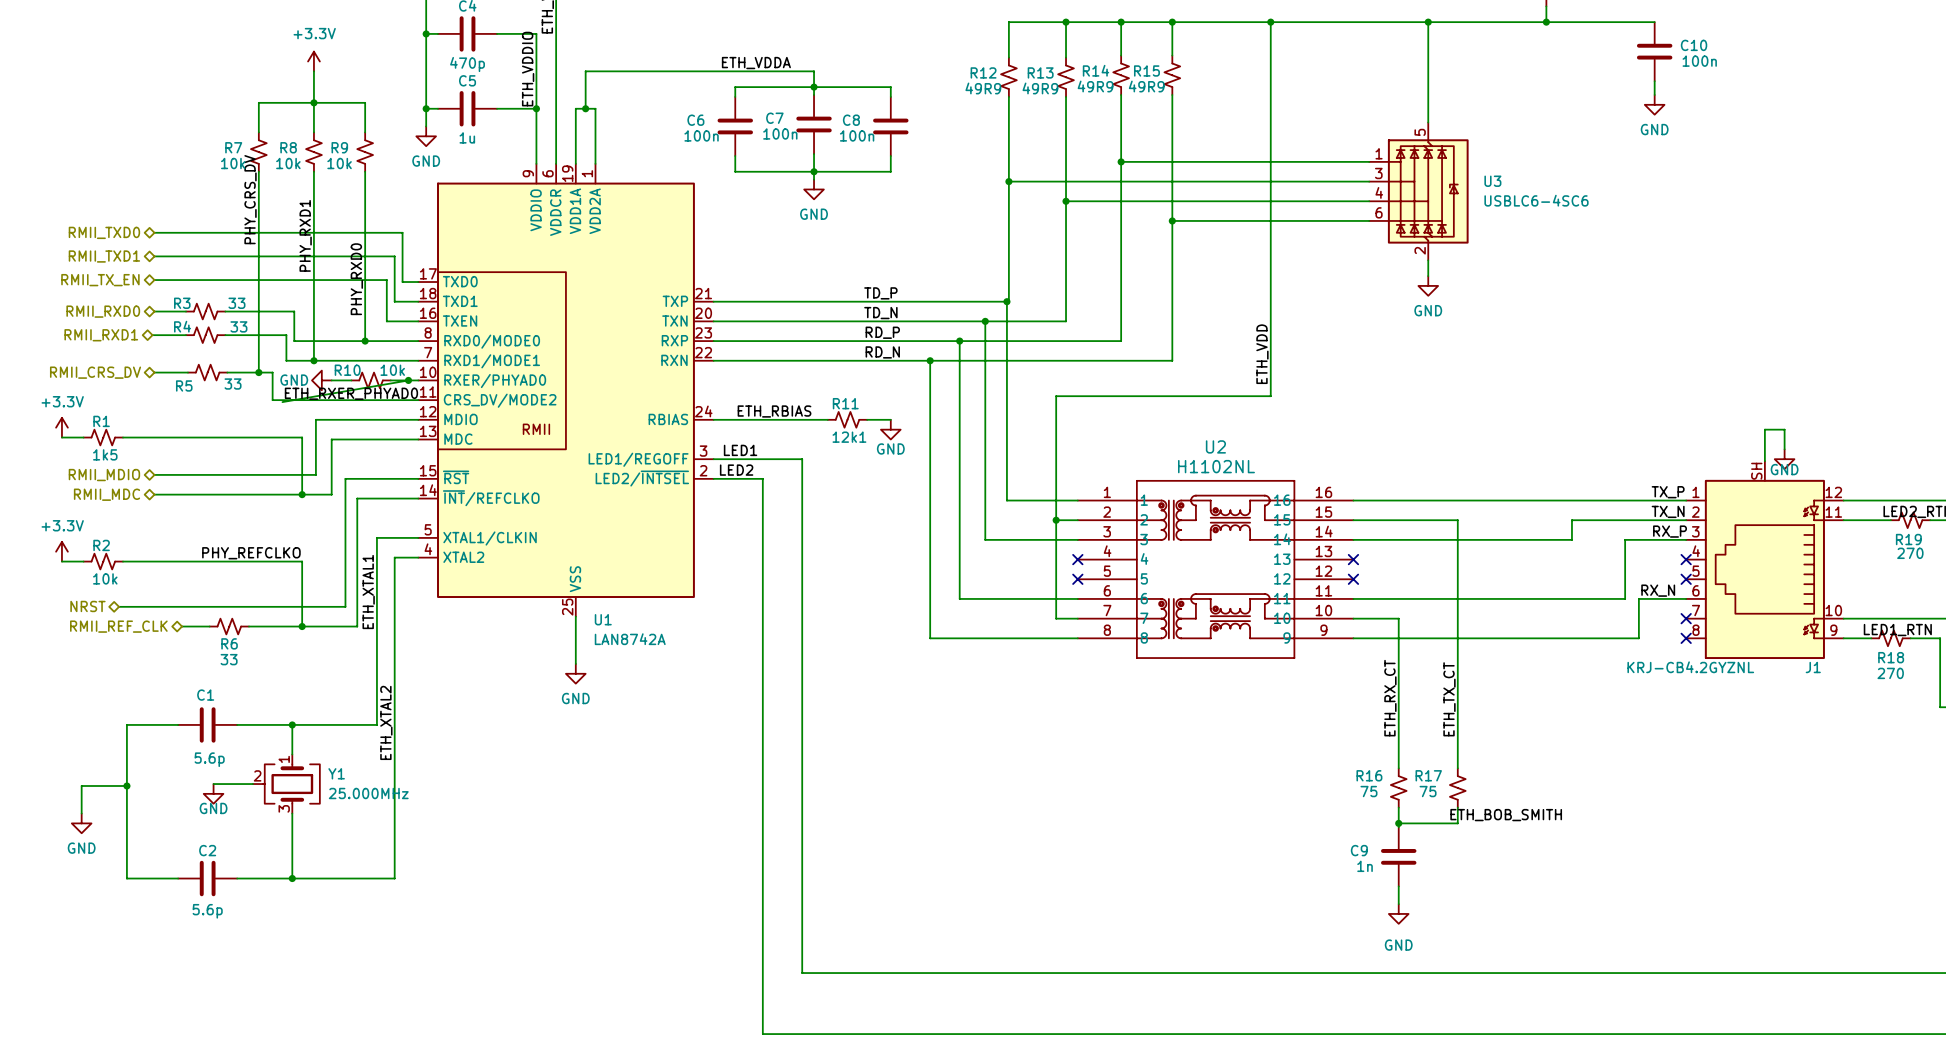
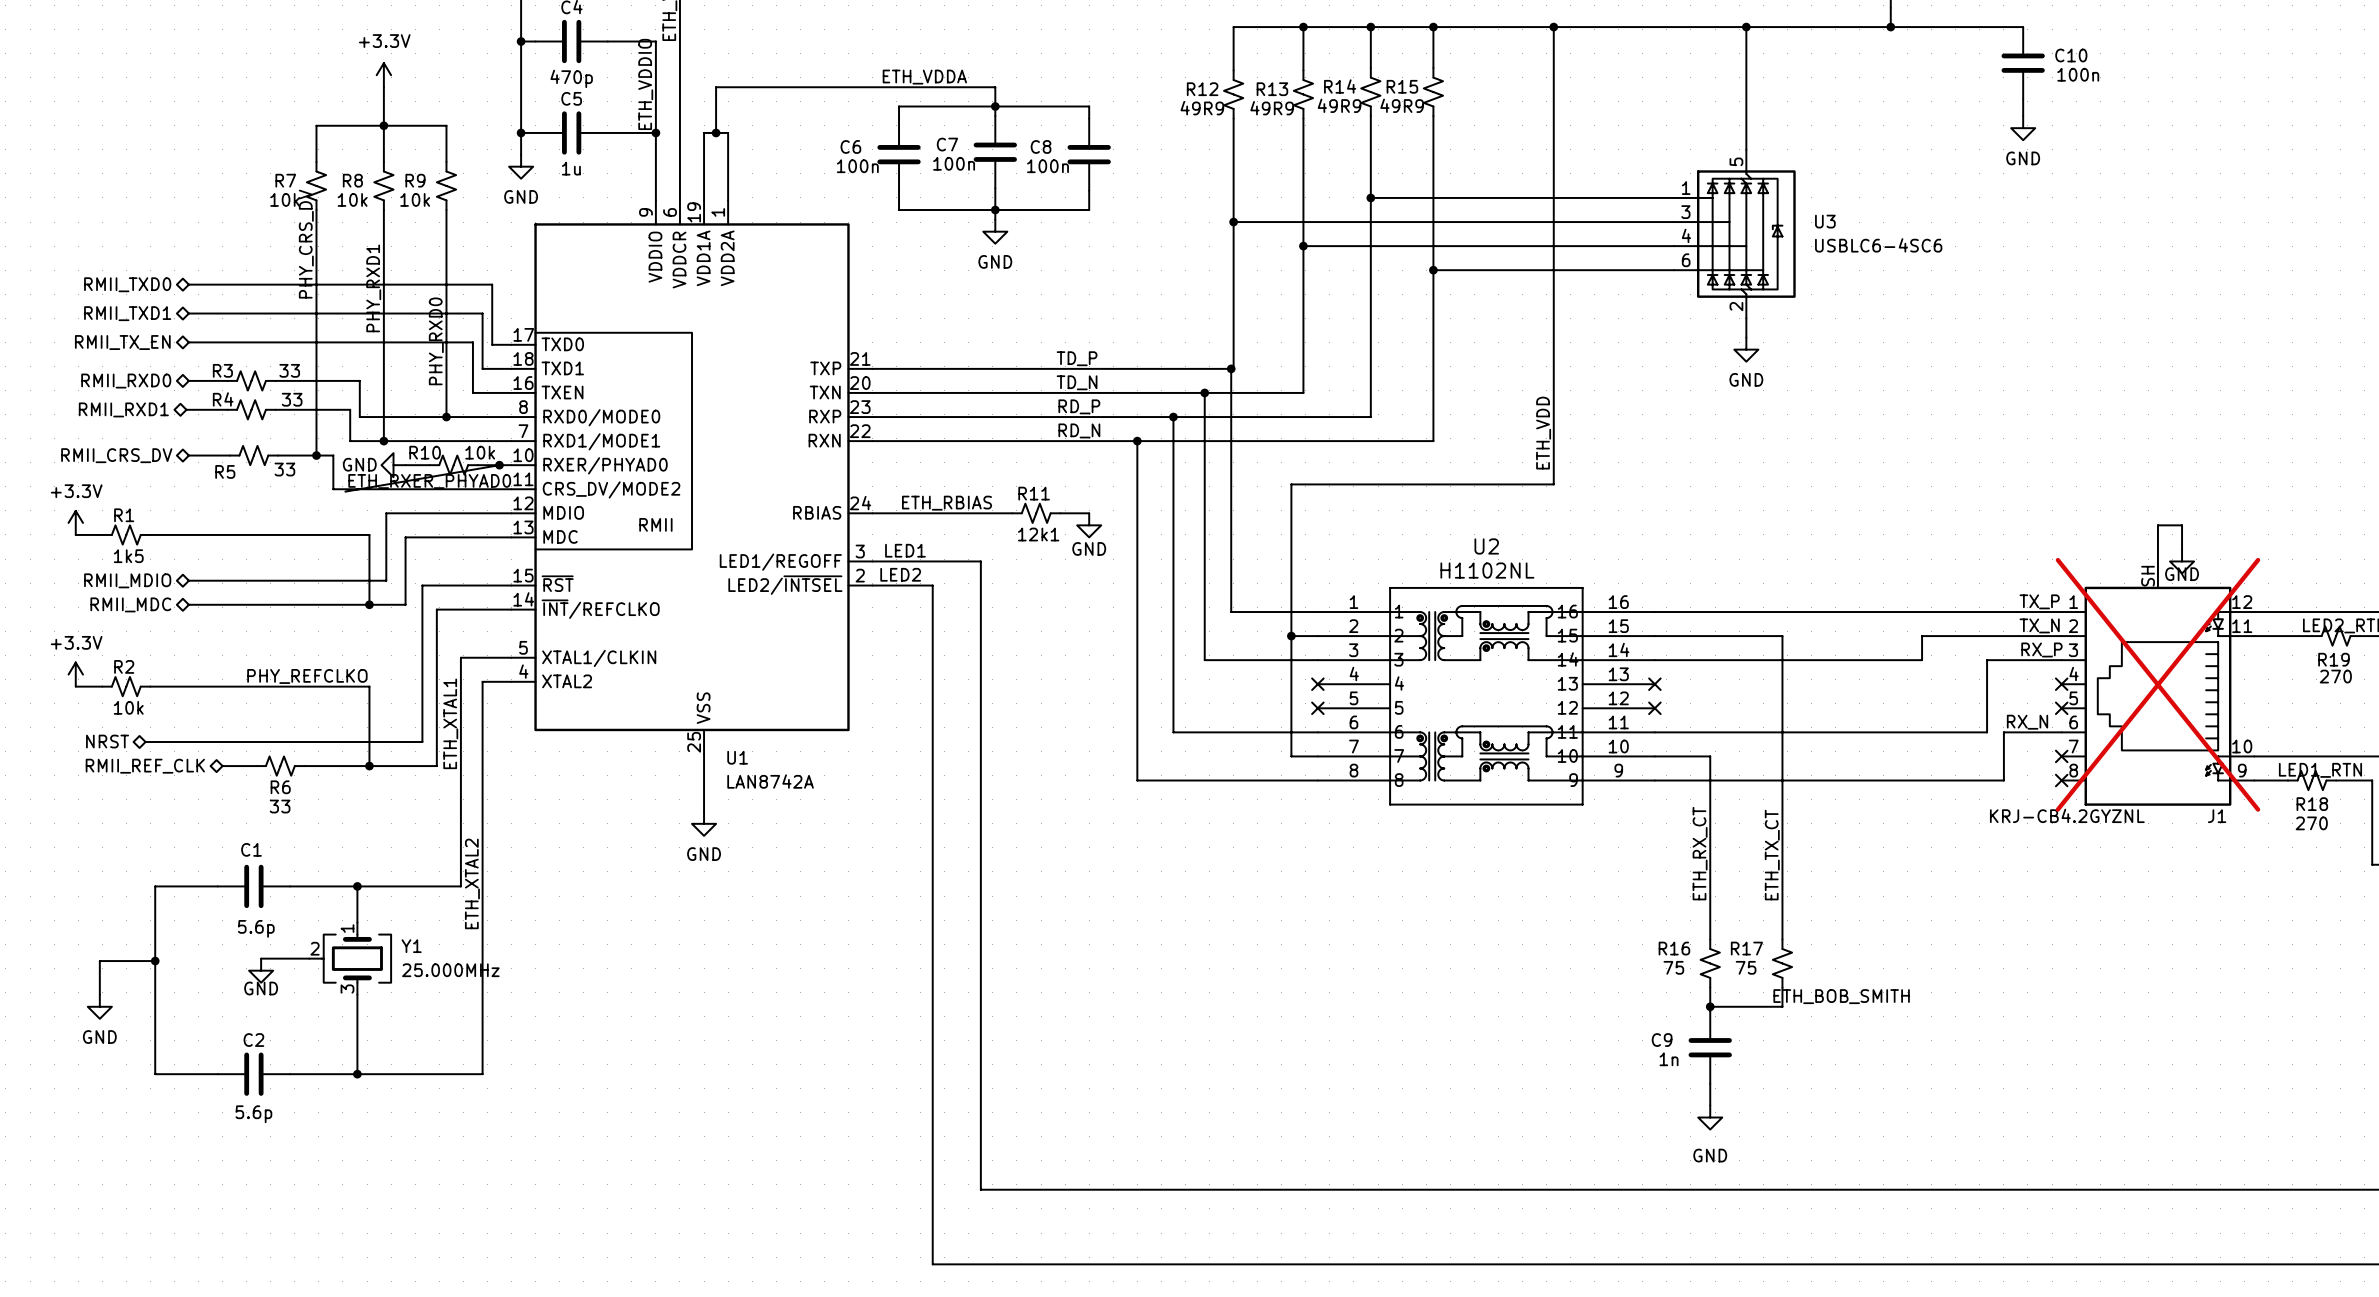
J1 do-not-place cross: none -> (2157, 684)

